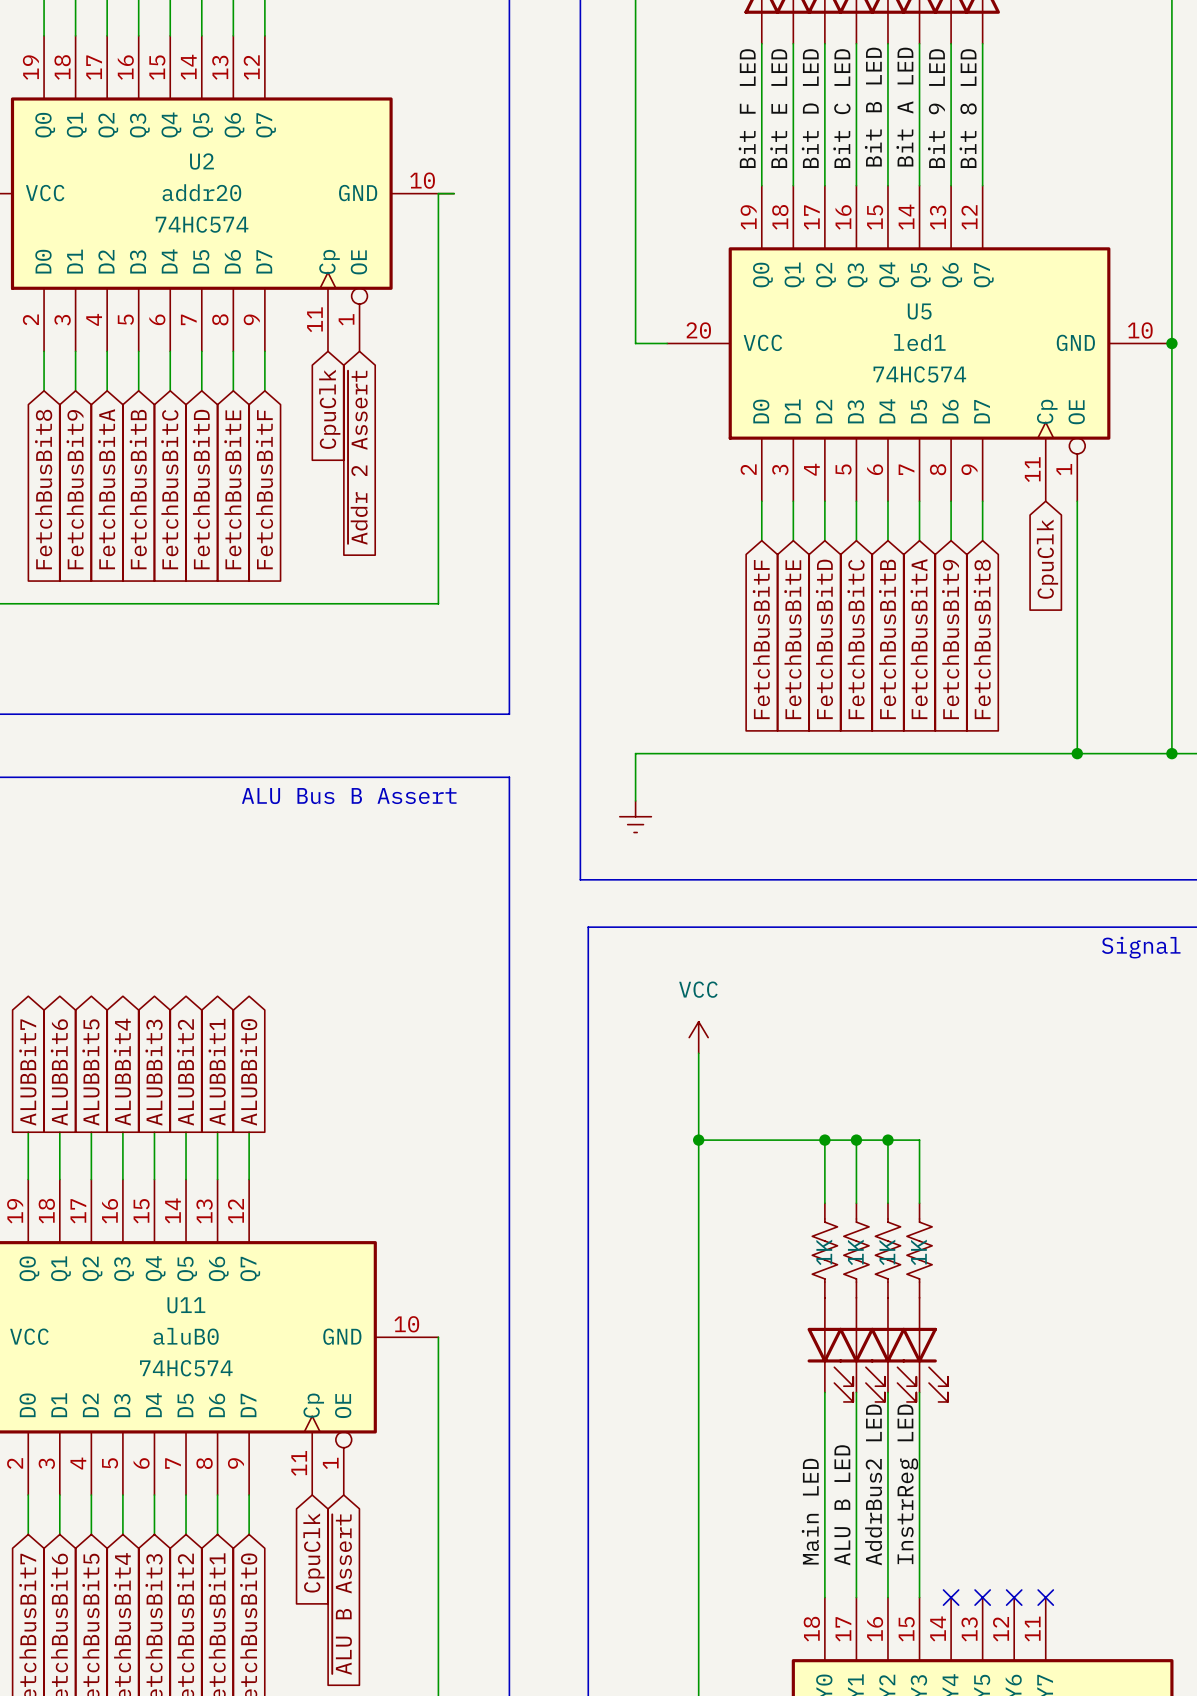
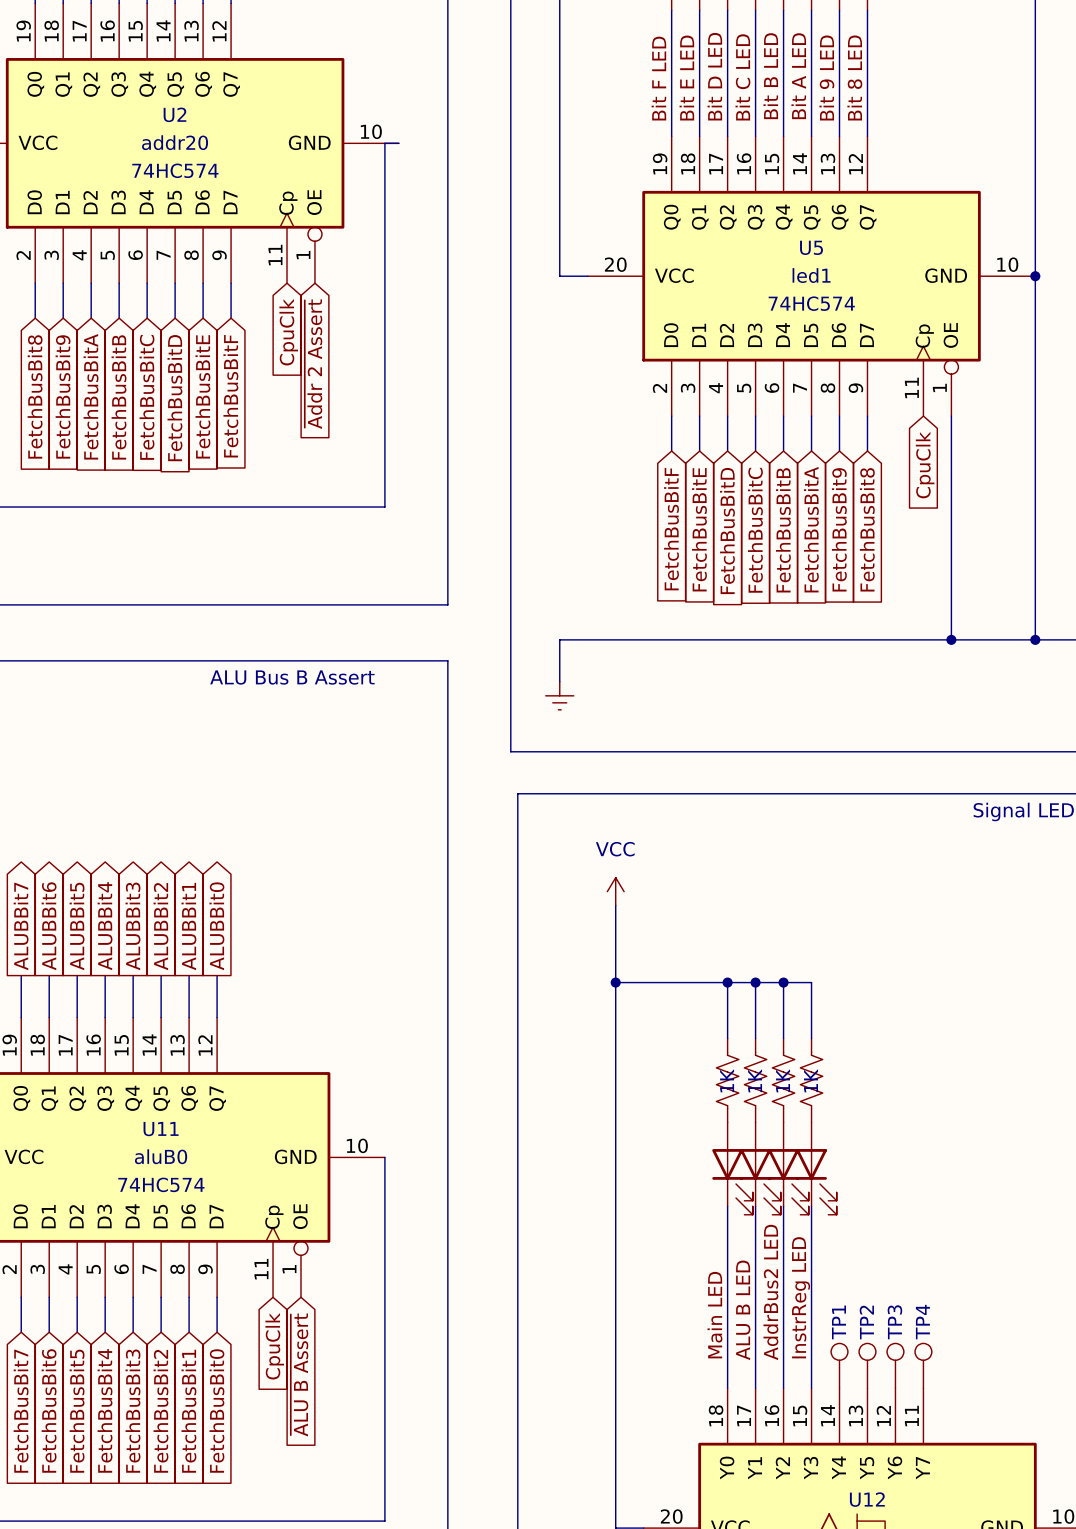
TP1: none -> (839, 1365)
TP2: none -> (867, 1365)
TP3: none -> (895, 1365)
TP4: none -> (923, 1365)
no-connect mark: (951, 1597) -> none
no-connect mark: (982, 1597) -> none
no-connect mark: (1014, 1597) -> none
no-connect mark: (1045, 1597) -> none

